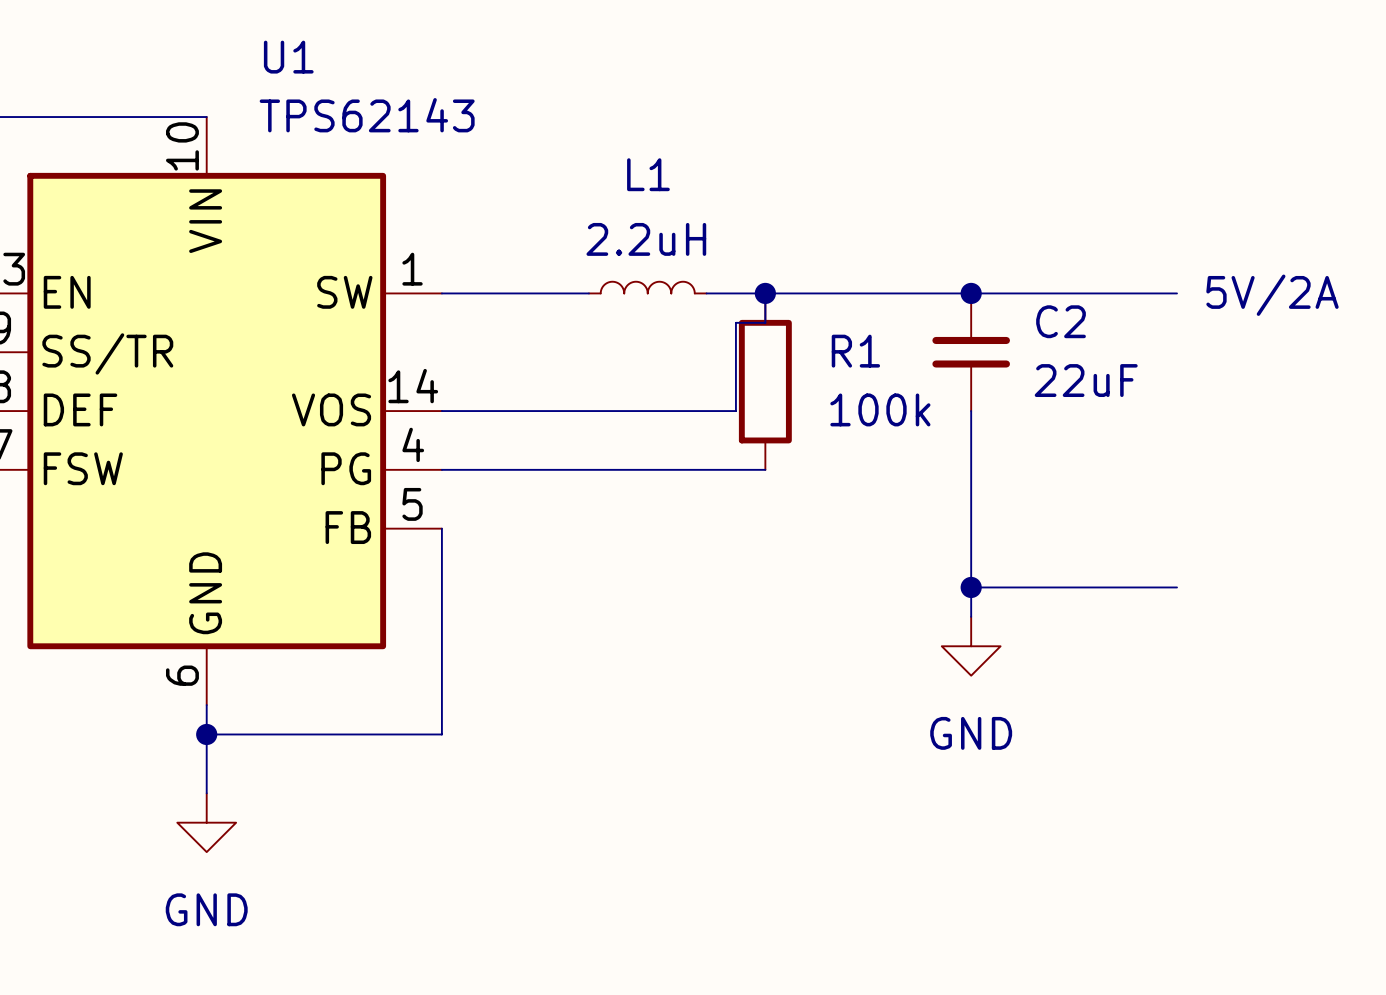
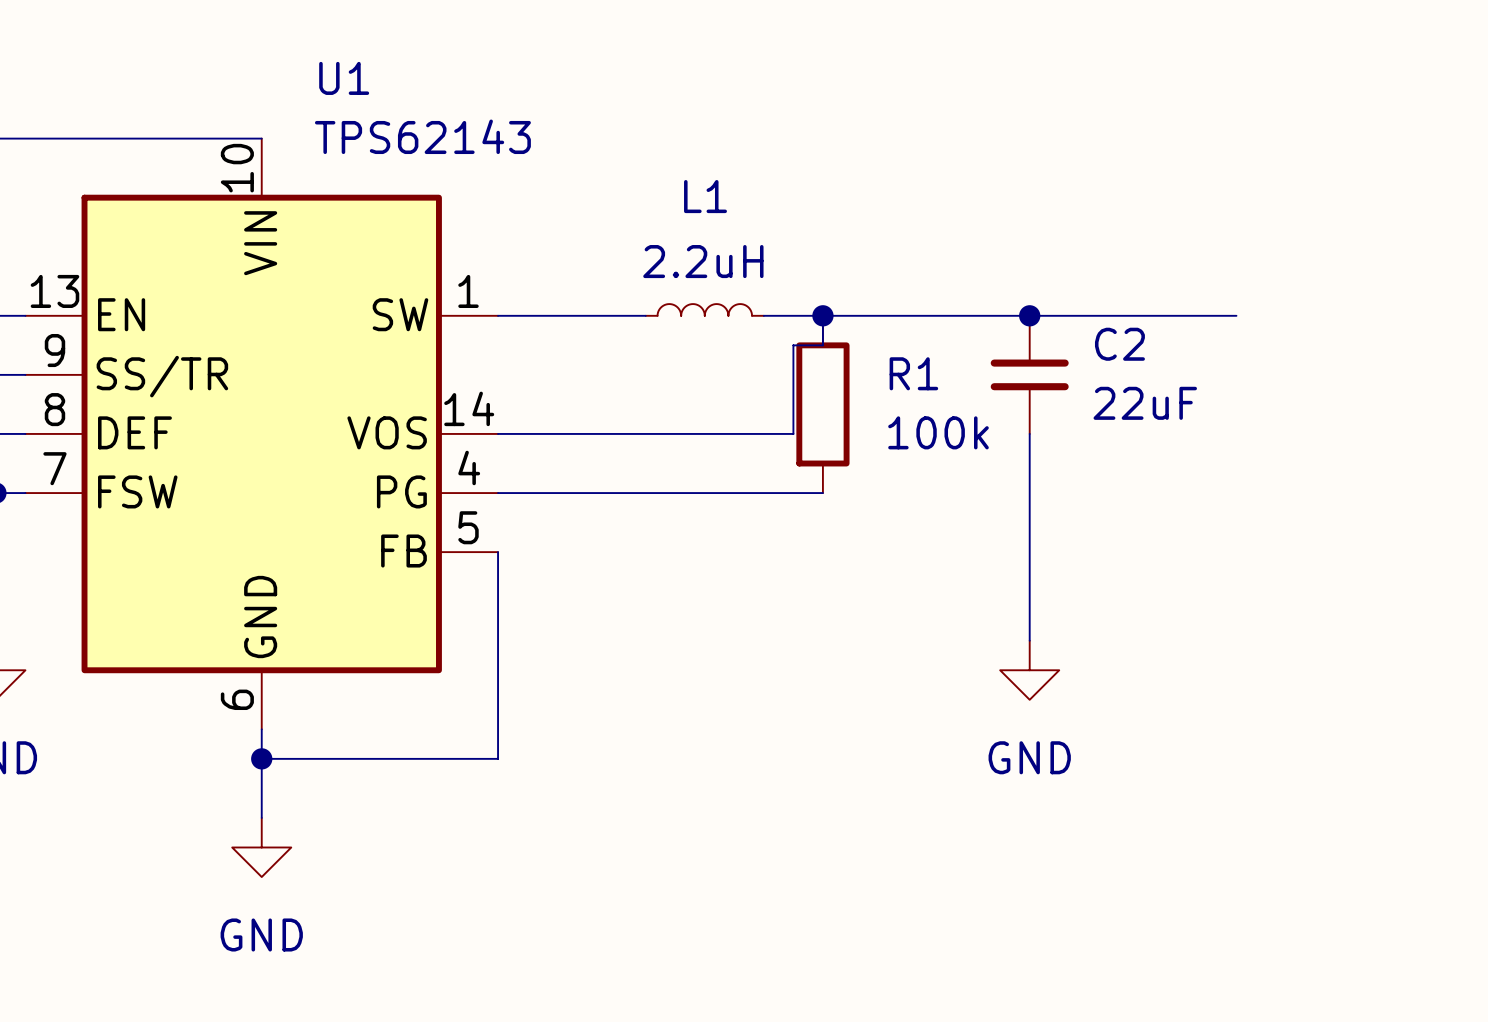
text: 5V/2A (1272, 295) -> none
wire: (971, 587) (1177, 587) -> none
junction: (971, 587) -> none

